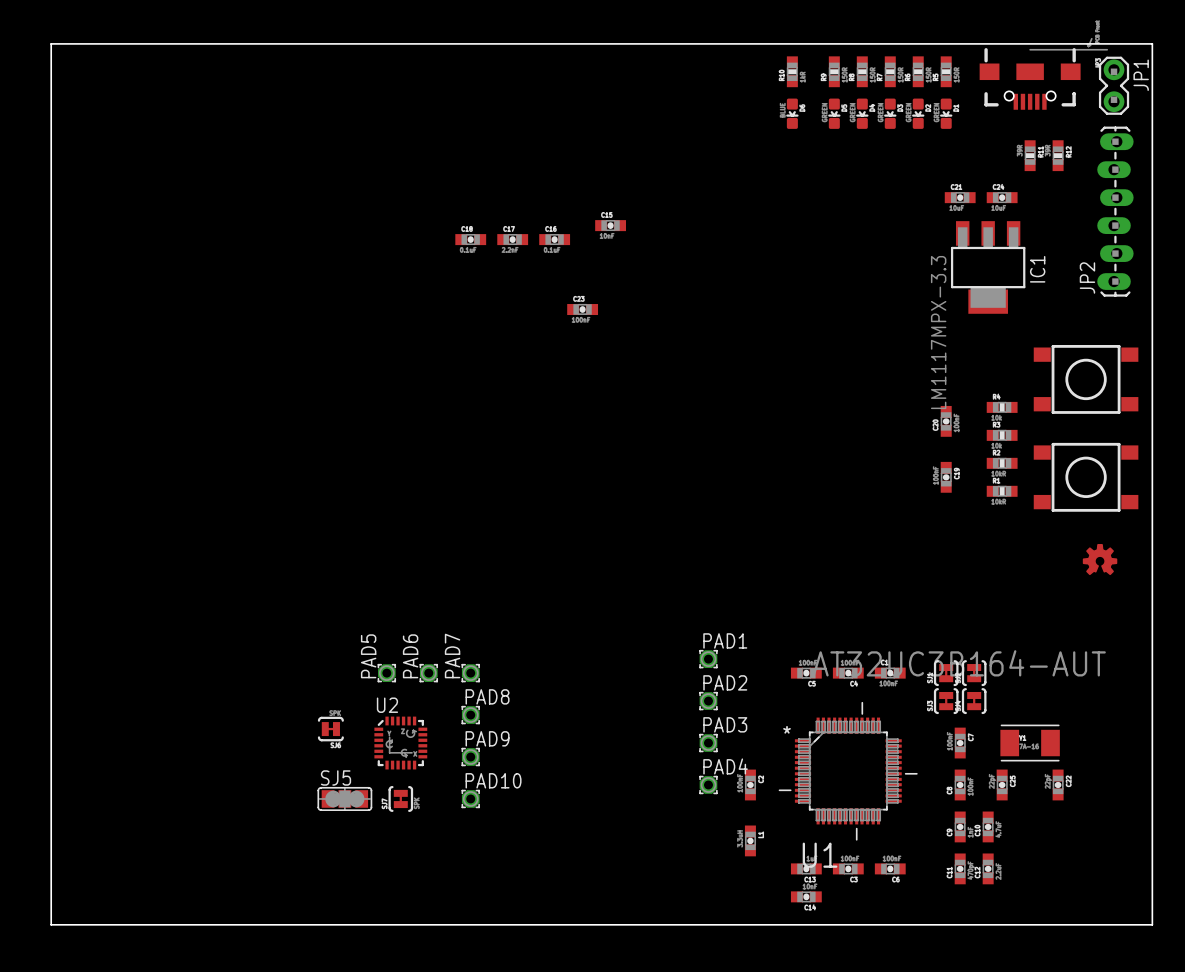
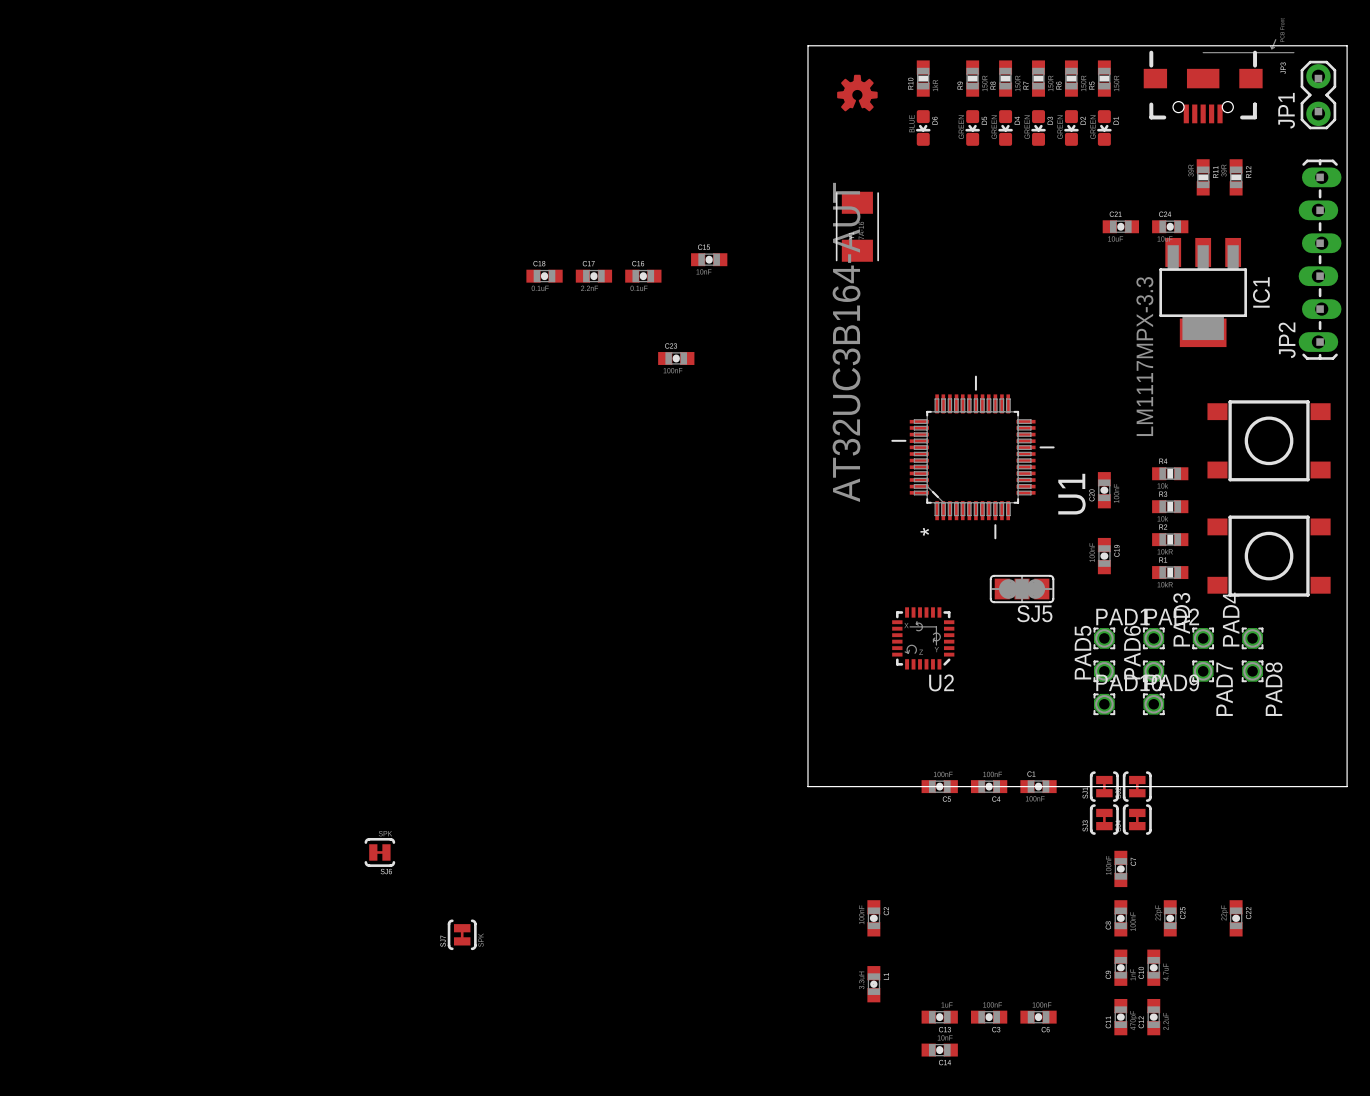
board edge: (694, 43) (51, 43) (51, 924) (1152, 924) (1152, 673) -> (807, 45) (807, 786) (1347, 786)
drawing: none -> [837, 74, 878, 112]
JP1 name position: JP1 (1141, 75) -> JP1 (1286, 110)
JP1 position: (1114, 85) -> (1318, 95)
JP2 position: (1115, 211) -> (1320, 259)
IC1 position: (988, 267) -> (1203, 292)
drawing: [1082, 544, 1118, 576] -> none
PAD7 name position: PAD7 (452, 656) -> PAD7 (1224, 689)
PAD1 position: (708, 659) -> (1104, 638)
PAD5 position: (386, 673) -> (1104, 671)
PAD6 position: (428, 673) -> (1153, 671)
PAD7 position: (470, 673) -> (1203, 671)
PAD8 name rotation: 0° (487, 696) -> 90° counterclockwise (1273, 689)
PAD2 position: (708, 701) -> (1153, 638)
U2 name position: U2 (387, 705) -> U2 (941, 682)
PAD8 position: (470, 715) -> (1252, 671)
U2 footprint: [374, 716, 428, 770] -> [892, 607, 955, 670]
PAD3 name rotation: 0° (725, 724) -> 90° counterclockwise (1181, 619)
PAD3 position: (708, 743) -> (1203, 638)
part rotation: 0° (1030, 743) -> 90° clockwise (857, 226)
part position: (1030, 743) -> (857, 226)
PAD9 position: (470, 757) -> (1153, 704)
PAD4 name rotation: 0° (725, 766) -> 90° counterclockwise (1231, 619)
U1 rotation: 0° (848, 771) -> 90° counterclockwise (972, 457)
U1 position: (848, 771) -> (972, 457)
PAD4 position: (708, 784) -> (1252, 638)
SJ5 rotation: 0° (344, 798) -> 180° (1022, 589)
SJ5 position: (344, 798) -> (1022, 589)
PAD10 position: (470, 798) -> (1104, 704)

